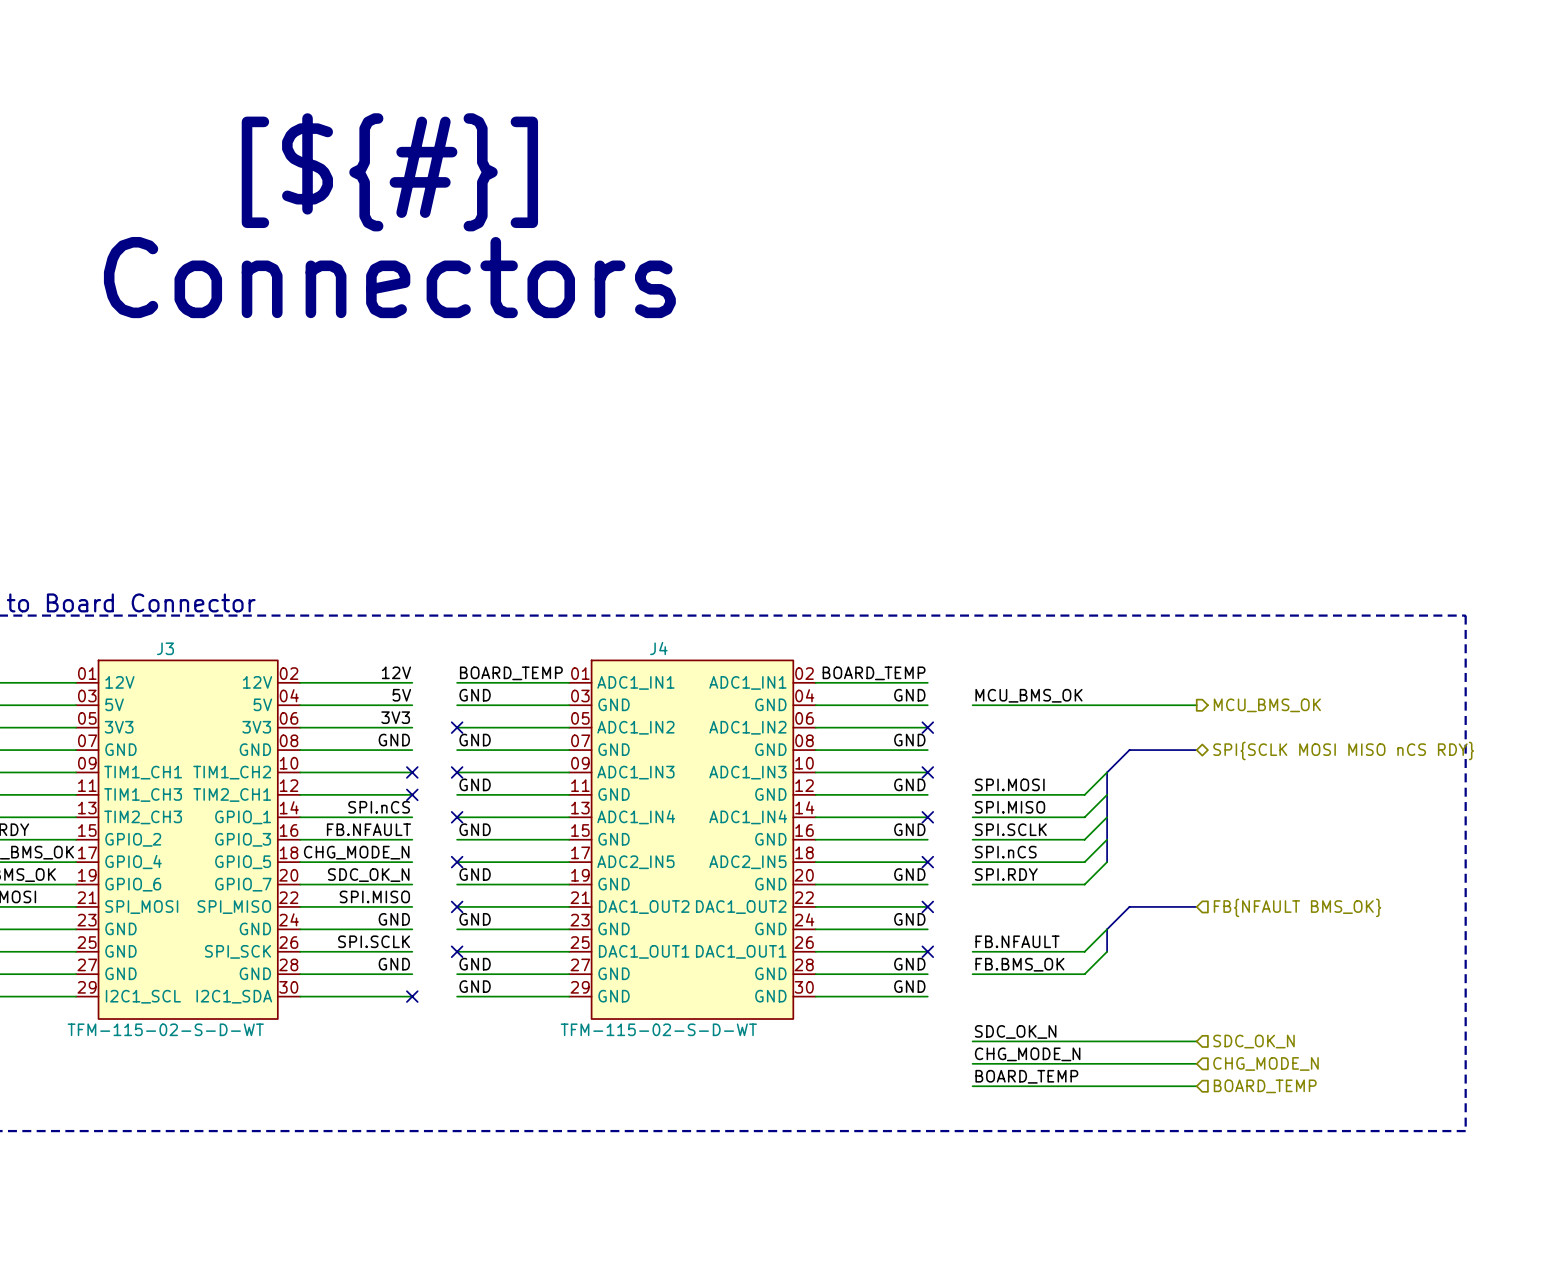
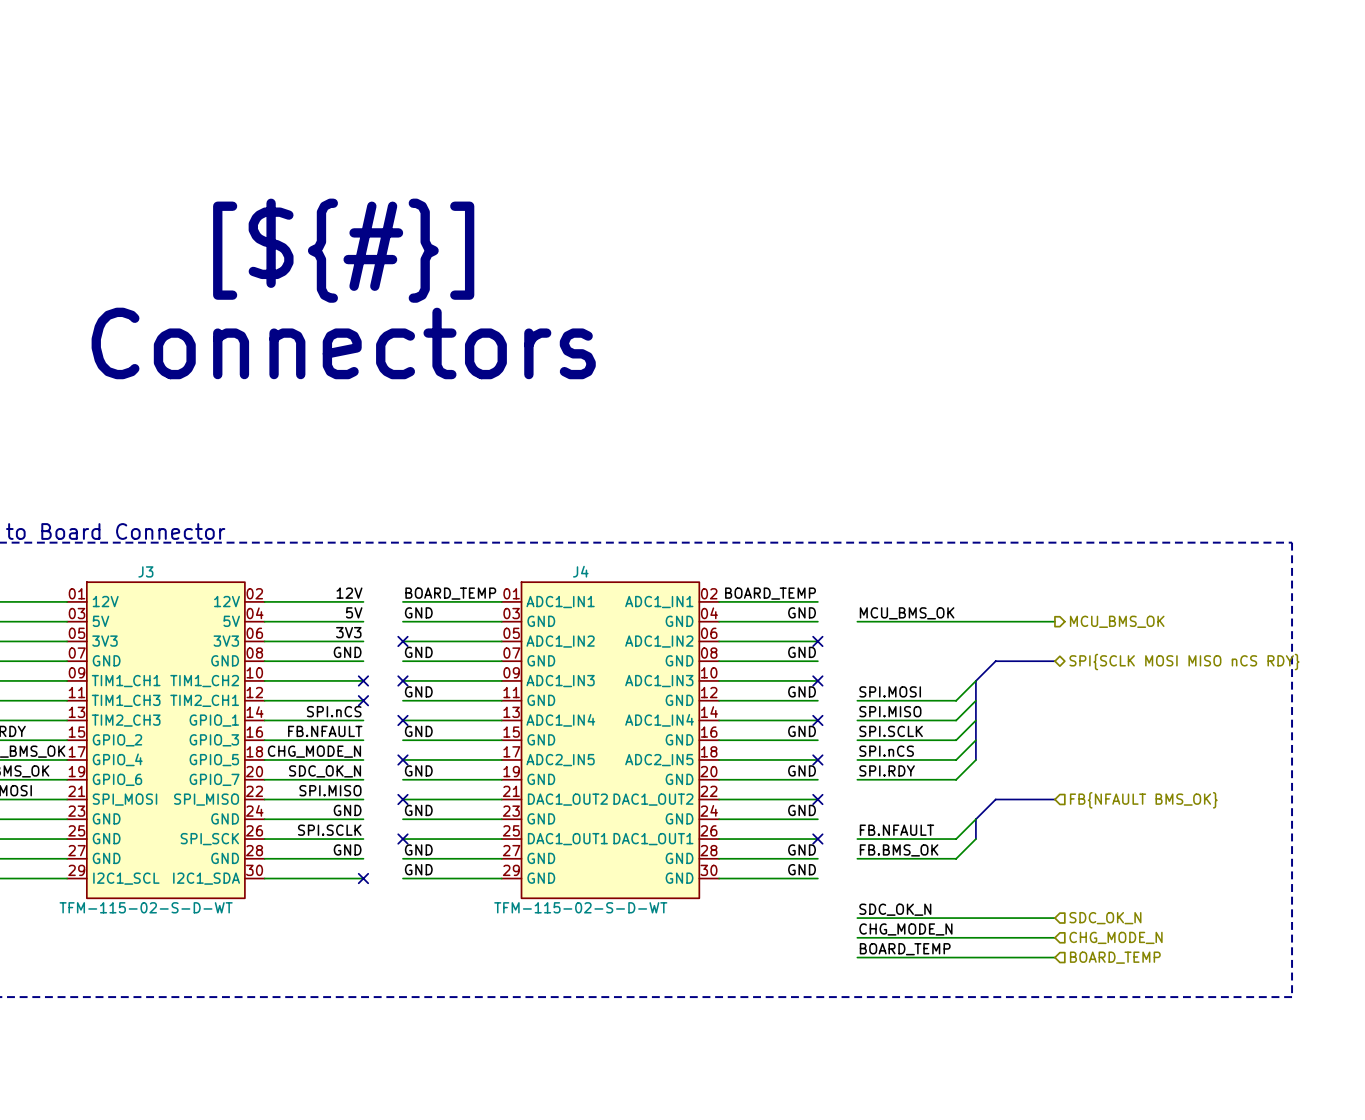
text: [${#}] (389, 172) -> none
text: Connectors (389, 277) -> [${#}] (343, 250)
text: none -> Connectors (343, 343)

